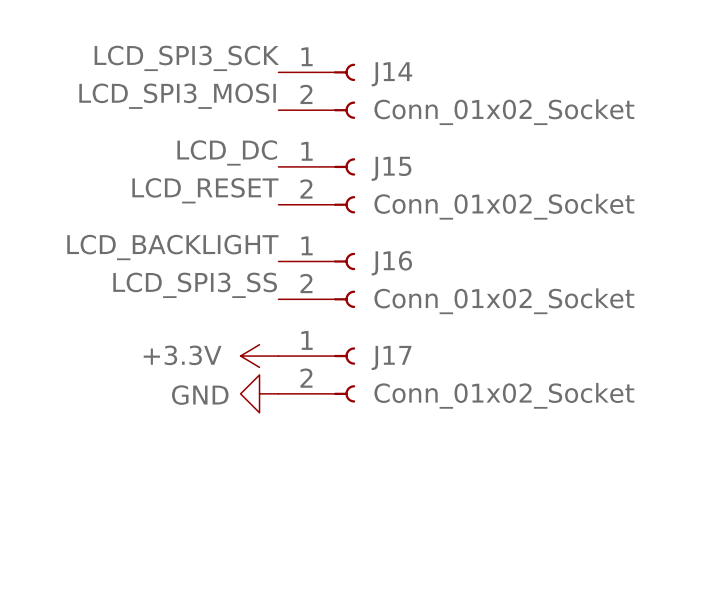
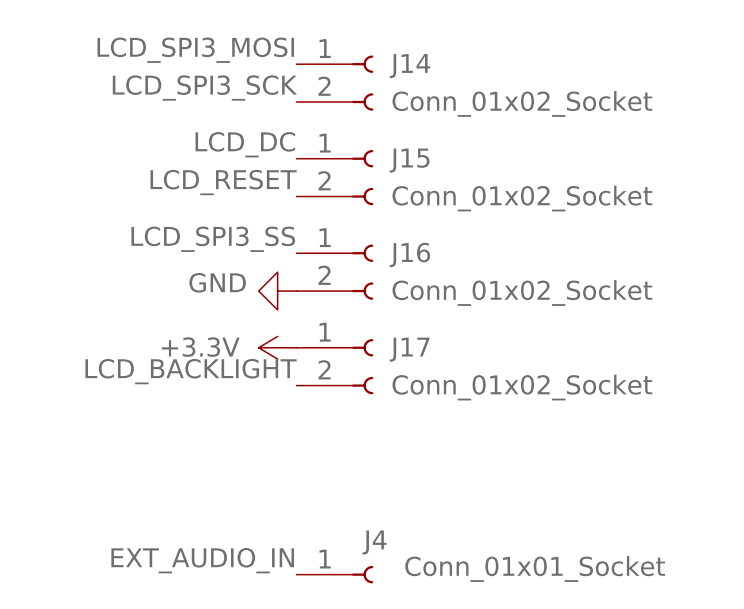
label: LCD_SPI3_SCK (186, 58) -> LCD_SPI3_MOSI (195, 50)
label: LCD_SPI3_MOSI (177, 96) -> LCD_SPI3_SCK (204, 88)
label: LCD_BACKLIGHT (172, 247) -> LCD_SPI3_SS (213, 239)
label: LCD_SPI3_SS (195, 285) -> none
label: none -> LCD_BACKLIGHT (191, 371)
power symbol position: GND (259, 393) -> GND (277, 291)
power symbol text position: GND (200, 395) -> GND (217, 282)
label: none -> EXT_AUDIO_IN (202, 560)
J4: none -> Conn_01x01_Socket (334, 574)

